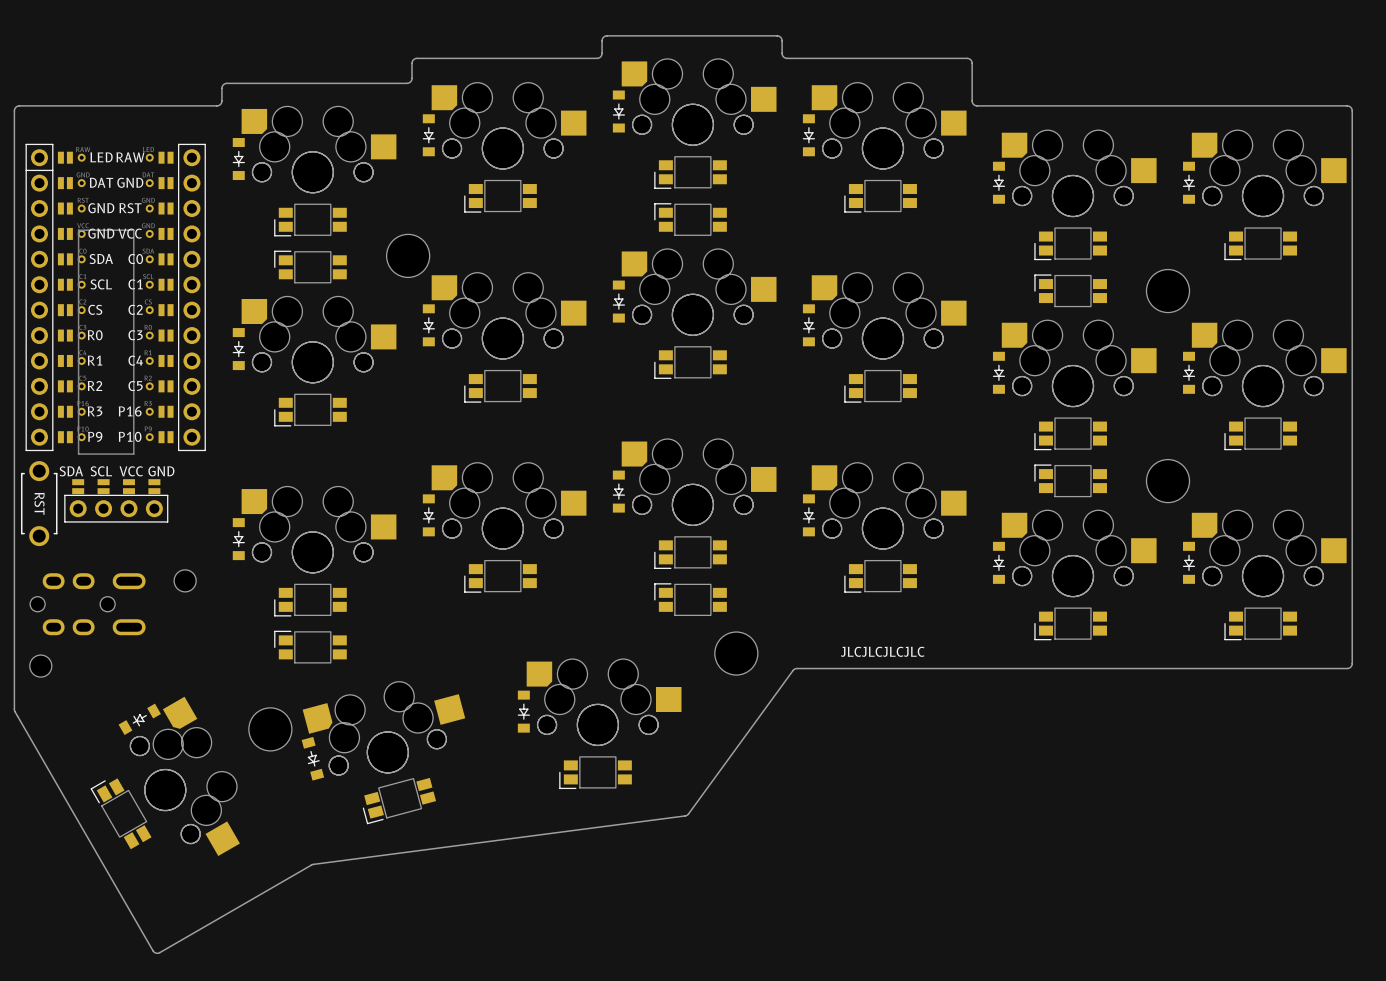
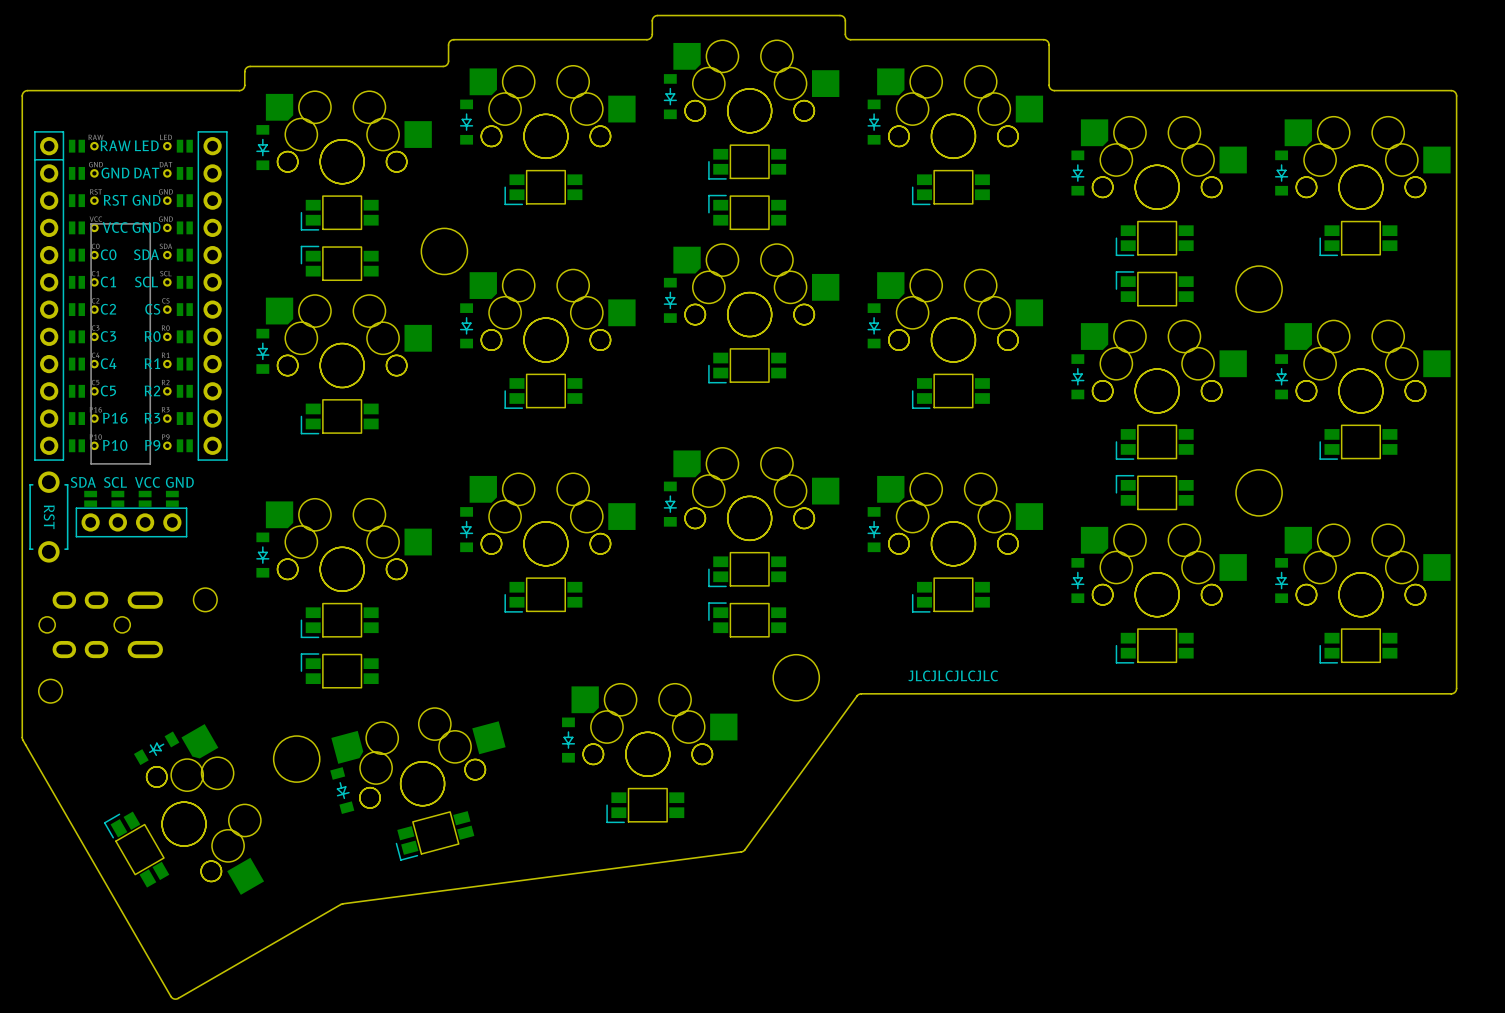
part footprint: [25, 143, 206, 452] -> [34, 131, 228, 461]

